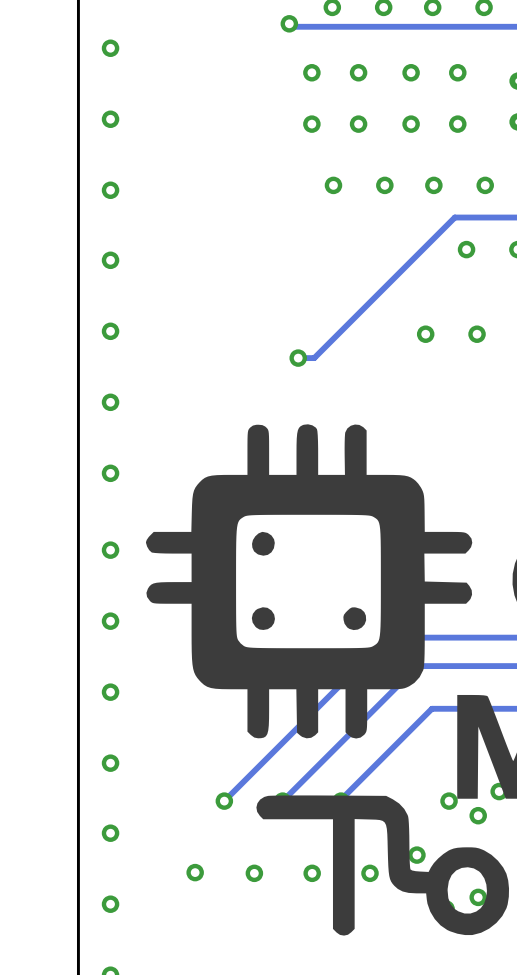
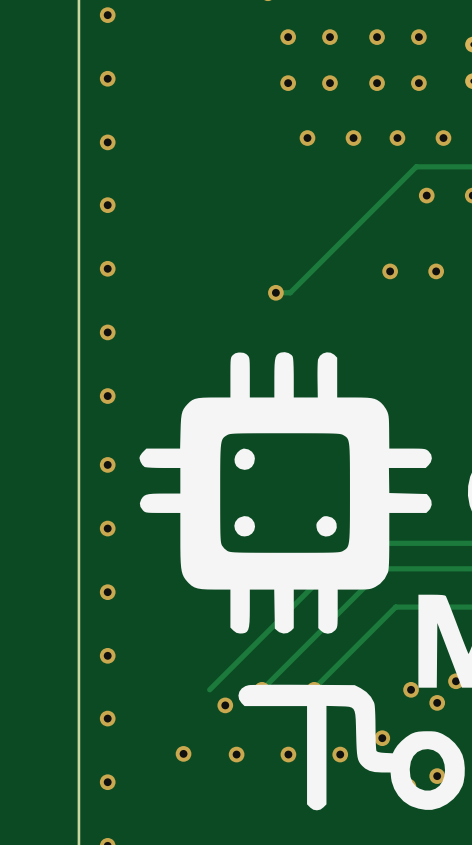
via position: (224, 801) -> (225, 705)

